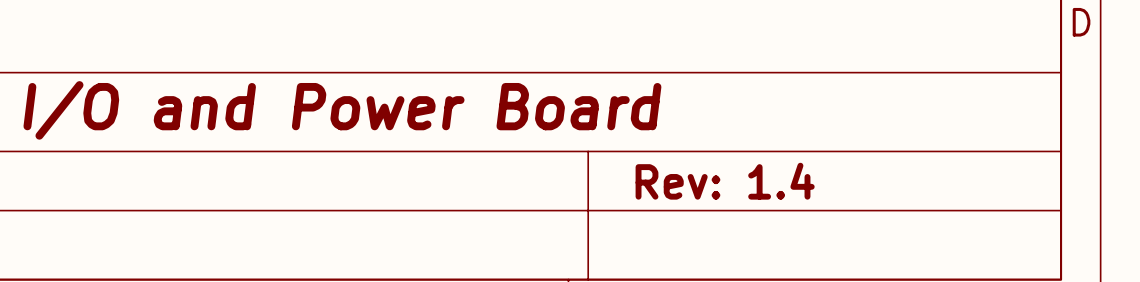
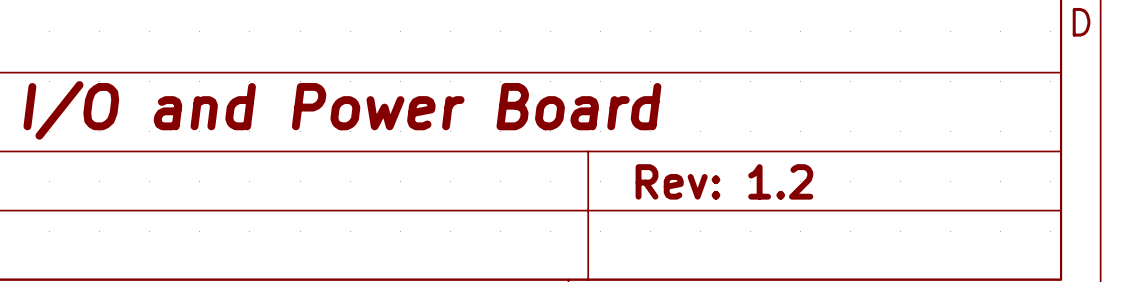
title block: Rev: 1.4 (725, 181) -> Rev: 1.2 (724, 181)

